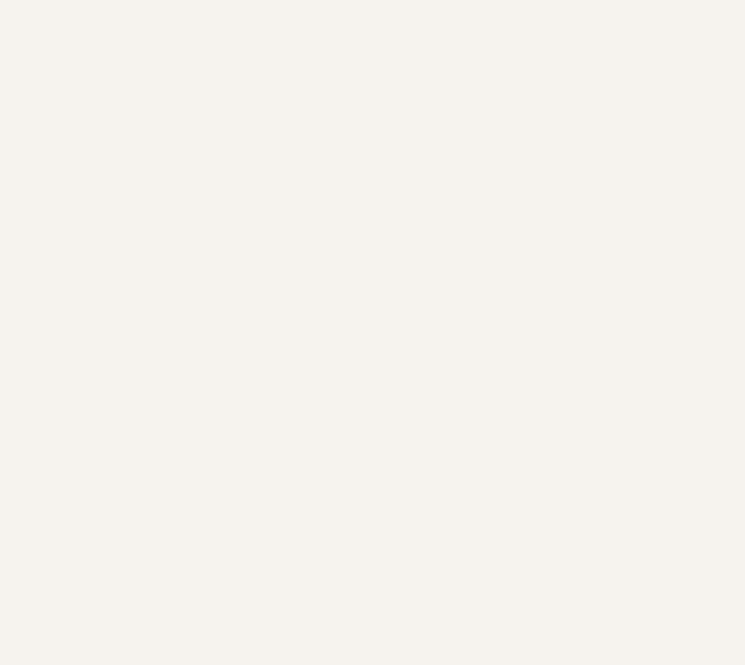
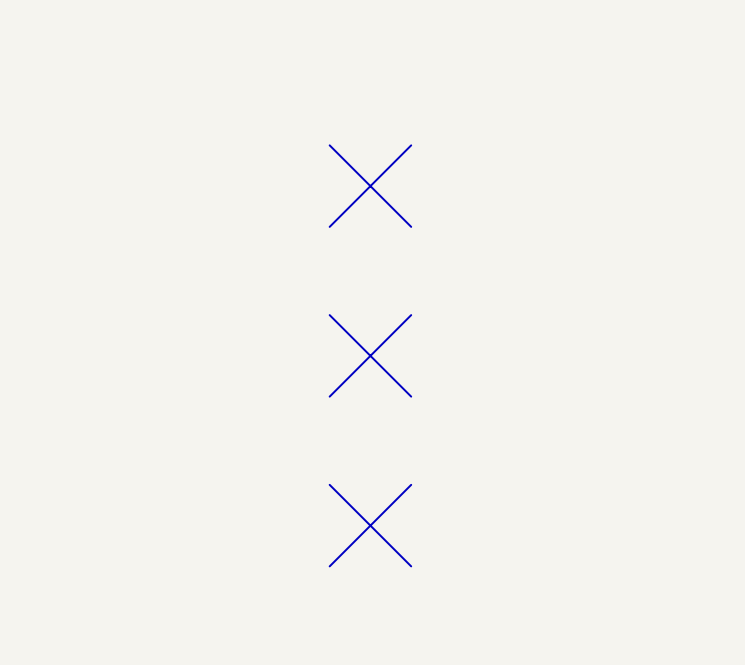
no-connect mark: none -> (370, 186)
no-connect mark: none -> (370, 355)
no-connect mark: none -> (370, 525)

